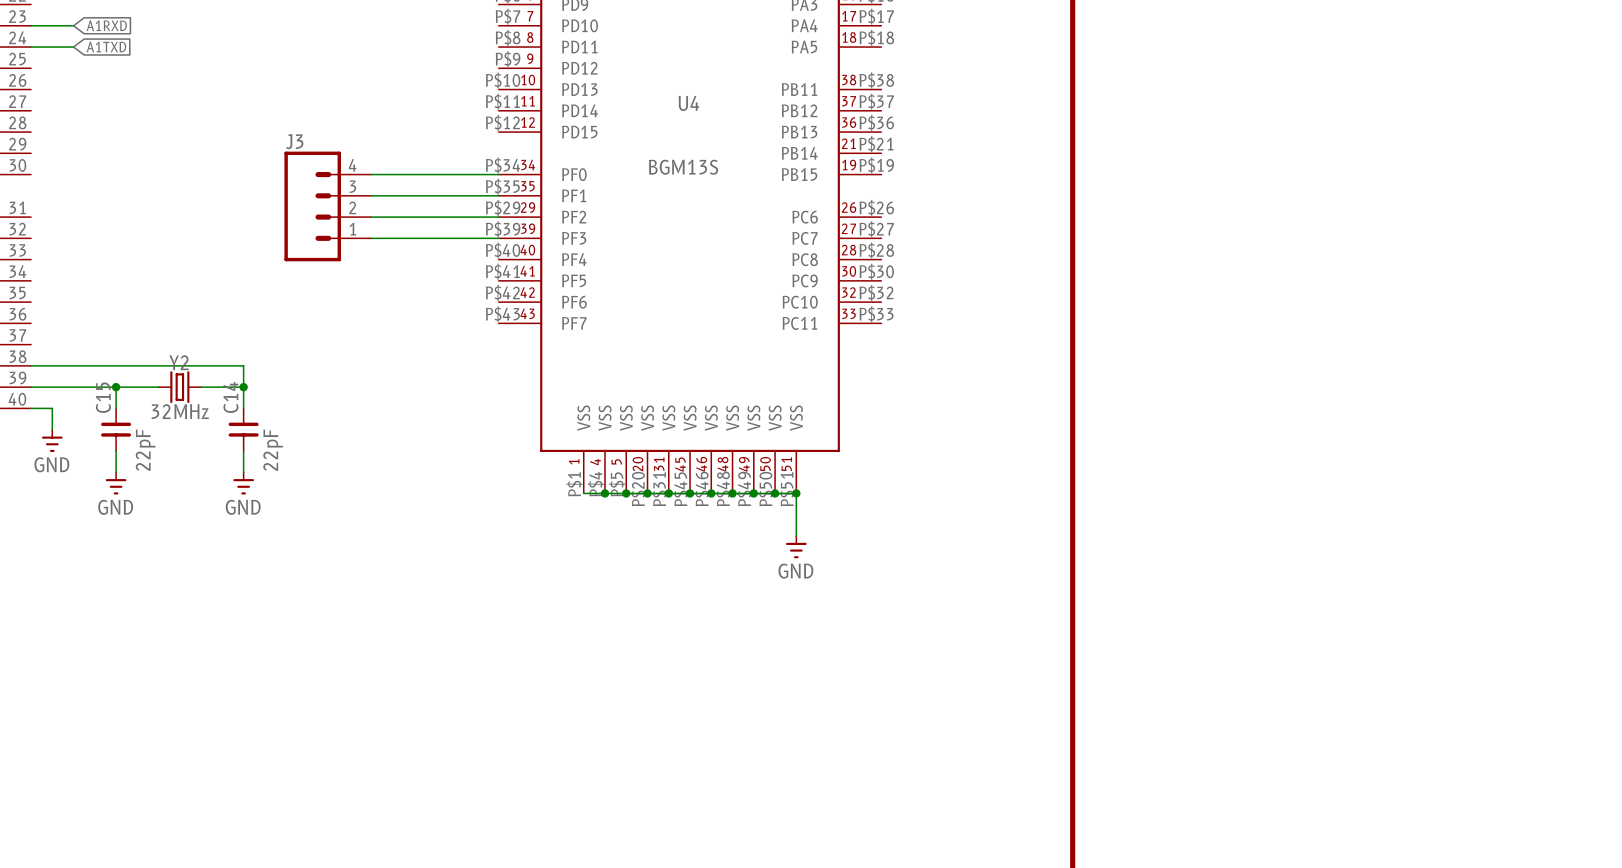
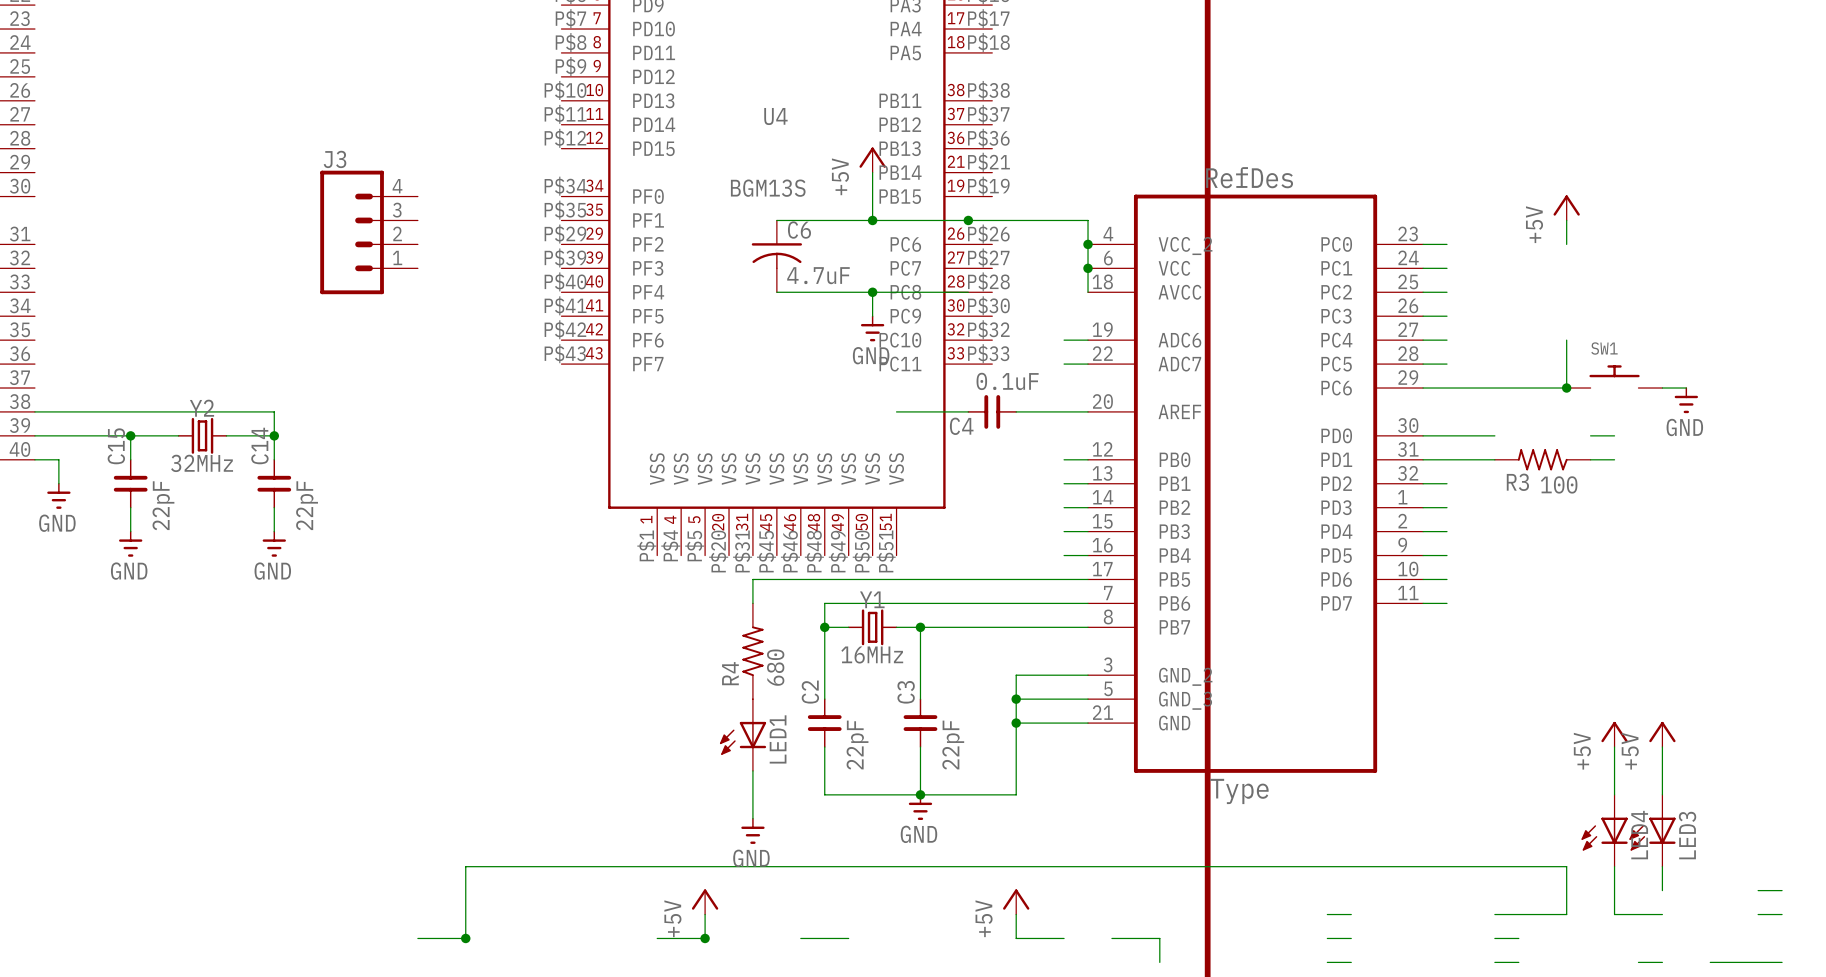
wire: (31, 25) (73, 25) -> none
global label: A1RXD (106, 25) -> none
wire: (31, 47) (73, 47) -> none
global label: A1TXD (106, 47) -> none
power symbol: none -> +5V (872, 160)
wire: none -> (872, 172) (872, 220)
wire: (371, 174) (498, 174) -> none
power symbol: none -> +5V (1566, 207)
wire: (371, 195) (498, 195) -> none
wire: none -> (776, 220) (1088, 220) (1088, 292)
junction: none -> (872, 220)
junction: none -> (968, 220)
wire: none -> (1566, 220) (1566, 244)
wire: (371, 217) (498, 217) -> none
junction: none -> (1088, 244)
wire: none -> (1423, 244) (1447, 244)
C6: none -> 4.7uF (776, 256)
wire: (371, 238) (498, 238) -> none
junction: none -> (1088, 268)
wire: none -> (1423, 268) (1447, 268)
wire: none -> (776, 292) (968, 292)
wire: none -> (872, 292) (872, 316)
junction: none -> (872, 292)
wire: none -> (1423, 292) (1447, 292)
wire: none -> (1423, 316) (1447, 316)
power symbol: none -> GND (872, 328)
wire: none -> (1064, 340) (1088, 340)
wire: none -> (1423, 340) (1447, 340)
wire: none -> (1566, 340) (1566, 388) (1423, 388)
wire: none -> (1064, 364) (1088, 364)
wire: none -> (1423, 364) (1447, 364)
SW1: none -> (1614, 376)
junction: none -> (1566, 388)
wire: none -> (1662, 388) (1686, 388)
power symbol: none -> GND (1686, 400)
wire: none -> (896, 411) (968, 411)
C4: none -> 0.1uF (992, 411)
wire: none -> (1016, 411) (1088, 411)
wire: none -> (1423, 435) (1494, 435)
wire: none -> (1590, 435) (1614, 435)
wire: none -> (1064, 459) (1088, 459)
wire: none -> (1423, 459) (1494, 459)
R3: none -> 100 (1542, 459)
wire: none -> (1590, 459) (1614, 459)
wire: none -> (1064, 483) (1088, 483)
part: none -> (1255, 483)
wire: none -> (1423, 483) (1447, 483)
wire: none -> (1064, 507) (1088, 507)
wire: none -> (1423, 507) (1447, 507)
wire: none -> (1064, 531) (1088, 531)
wire: none -> (1423, 531) (1447, 531)
wire: (583, 493) (796, 493) (796, 535) -> none
junction: (604, 493) -> none
junction: (626, 493) -> none
junction: (647, 493) -> none
junction: (668, 493) -> none
junction: (690, 493) -> none
junction: (711, 493) -> none
junction: (732, 493) -> none
junction: (753, 493) -> none
junction: (775, 493) -> none
junction: (796, 493) -> none
wire: none -> (1064, 555) (1088, 555)
wire: none -> (1423, 555) (1447, 555)
wire: none -> (1088, 579) (752, 579) (752, 603)
wire: none -> (1423, 579) (1447, 579)
wire: none -> (1088, 603) (824, 603) (824, 699)
wire: none -> (1423, 603) (1447, 603)
power symbol: GND (796, 546) -> none
wire: none -> (824, 627) (848, 627)
junction: none -> (824, 627)
Y1: none -> 16MHz (872, 627)
wire: none -> (896, 627) (1088, 627)
wire: none -> (920, 627) (920, 699)
junction: none -> (920, 627)
R4: none -> 680 (752, 651)
wire: none -> (1088, 675) (1016, 675) (1016, 794) (824, 794) (824, 747)
wire: none -> (1016, 699) (1088, 699)
junction: none -> (1016, 699)
C2: none -> 22pF (824, 723)
C3: none -> 22pF (920, 723)
wire: none -> (1016, 723) (1088, 723)
junction: none -> (1016, 723)
LED1: none -> (743, 735)
power symbol: none -> +5V (1614, 734)
power symbol: none -> +5V (1662, 734)
wire: none -> (920, 747) (920, 794)
wire: none -> (1614, 747) (1614, 794)
wire: none -> (1662, 747) (1662, 794)
wire: none -> (752, 770) (752, 818)
junction: none -> (920, 794)
power symbol: none -> GND (920, 807)
LED4: none -> (1604, 830)
LED3: none -> (1652, 830)
power symbol: none -> GND (752, 831)
wire: none -> (1614, 866) (1614, 914) (1662, 914)
wire: none -> (1662, 866) (1662, 890)
wire: none -> (1758, 890) (1782, 890)
power symbol: none -> +5V (705, 901)
power symbol: none -> +5V (1016, 901)
wire: none -> (705, 914) (705, 938) (657, 938)
wire: none -> (1016, 914) (1016, 938) (1064, 938)
wire: none -> (1327, 914) (1351, 914)
wire: none -> (1494, 914) (1566, 914) (1566, 866) (465, 866) (465, 938) (417, 938)
wire: none -> (1758, 914) (1782, 914)
junction: none -> (465, 938)
junction: none -> (705, 938)
wire: none -> (800, 938) (848, 938)
wire: none -> (1111, 938) (1159, 938) (1159, 962)
wire: none -> (1327, 938) (1351, 938)
wire: none -> (1494, 938) (1518, 938)
wire: none -> (1327, 962) (1351, 962)
wire: none -> (1494, 962) (1518, 962)
wire: none -> (1638, 962) (1662, 962)
wire: none -> (1710, 962) (1782, 962)

